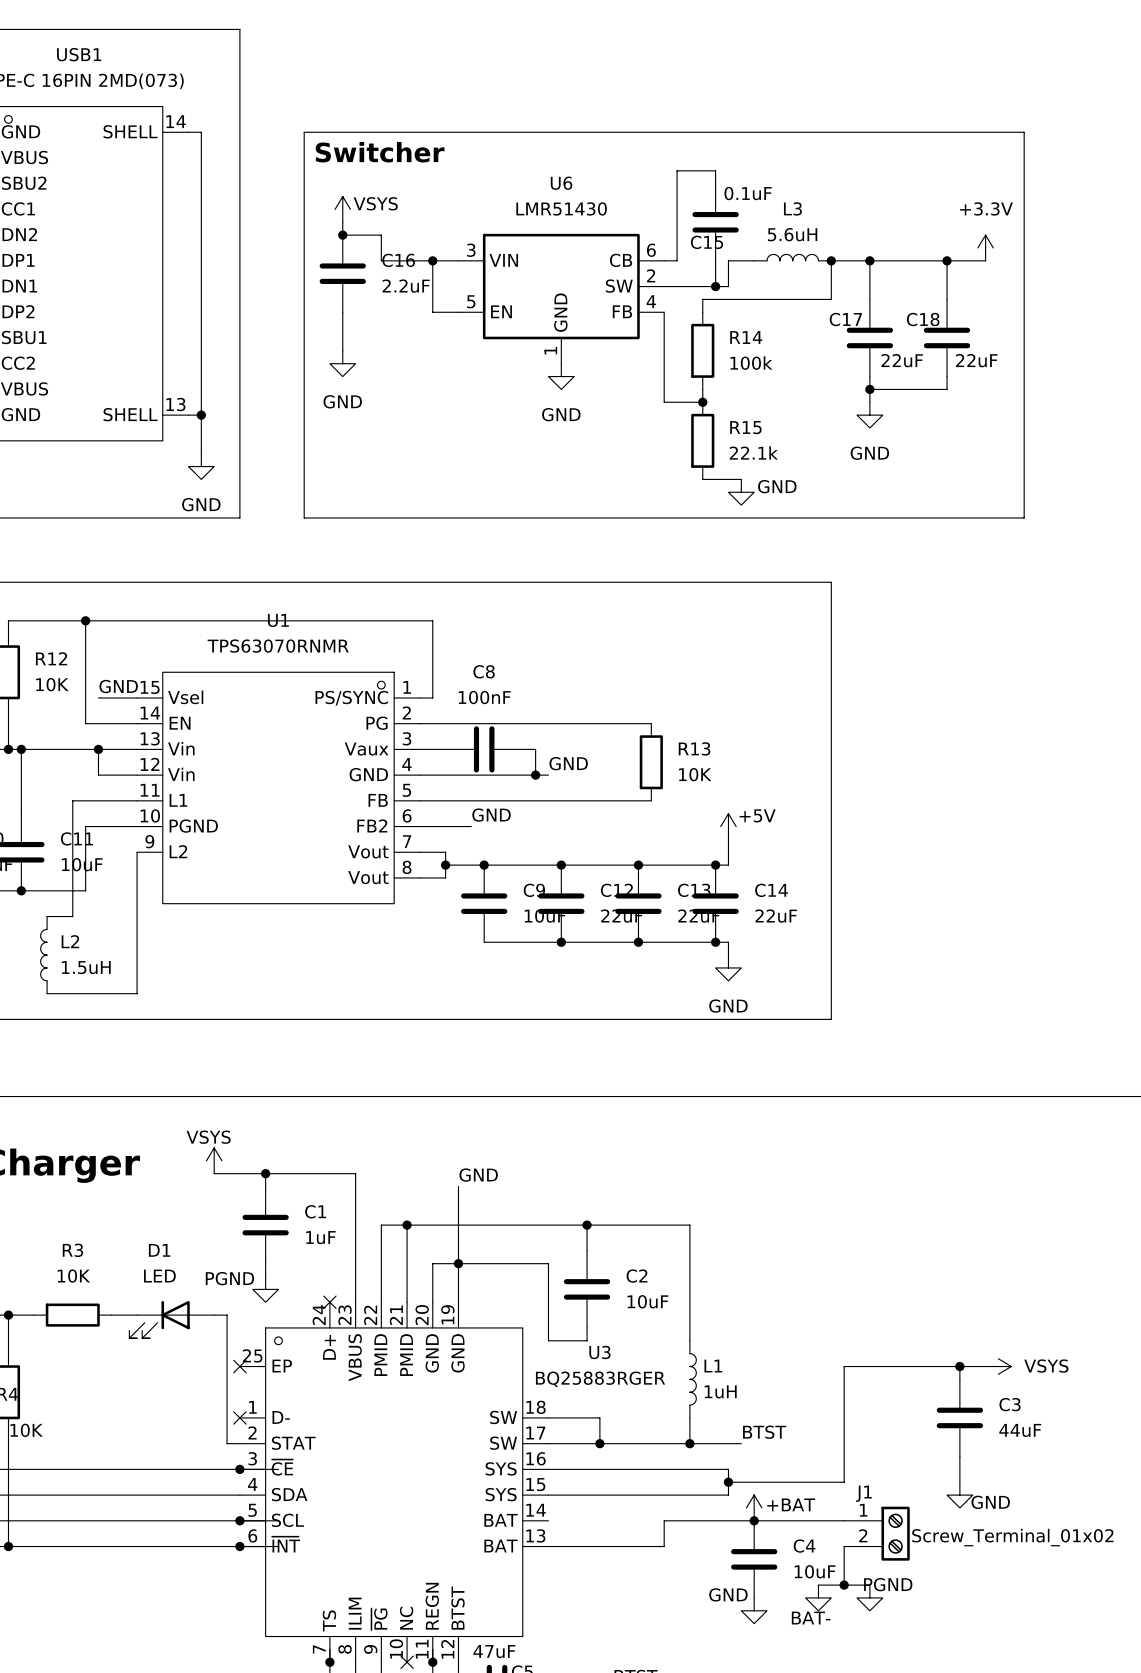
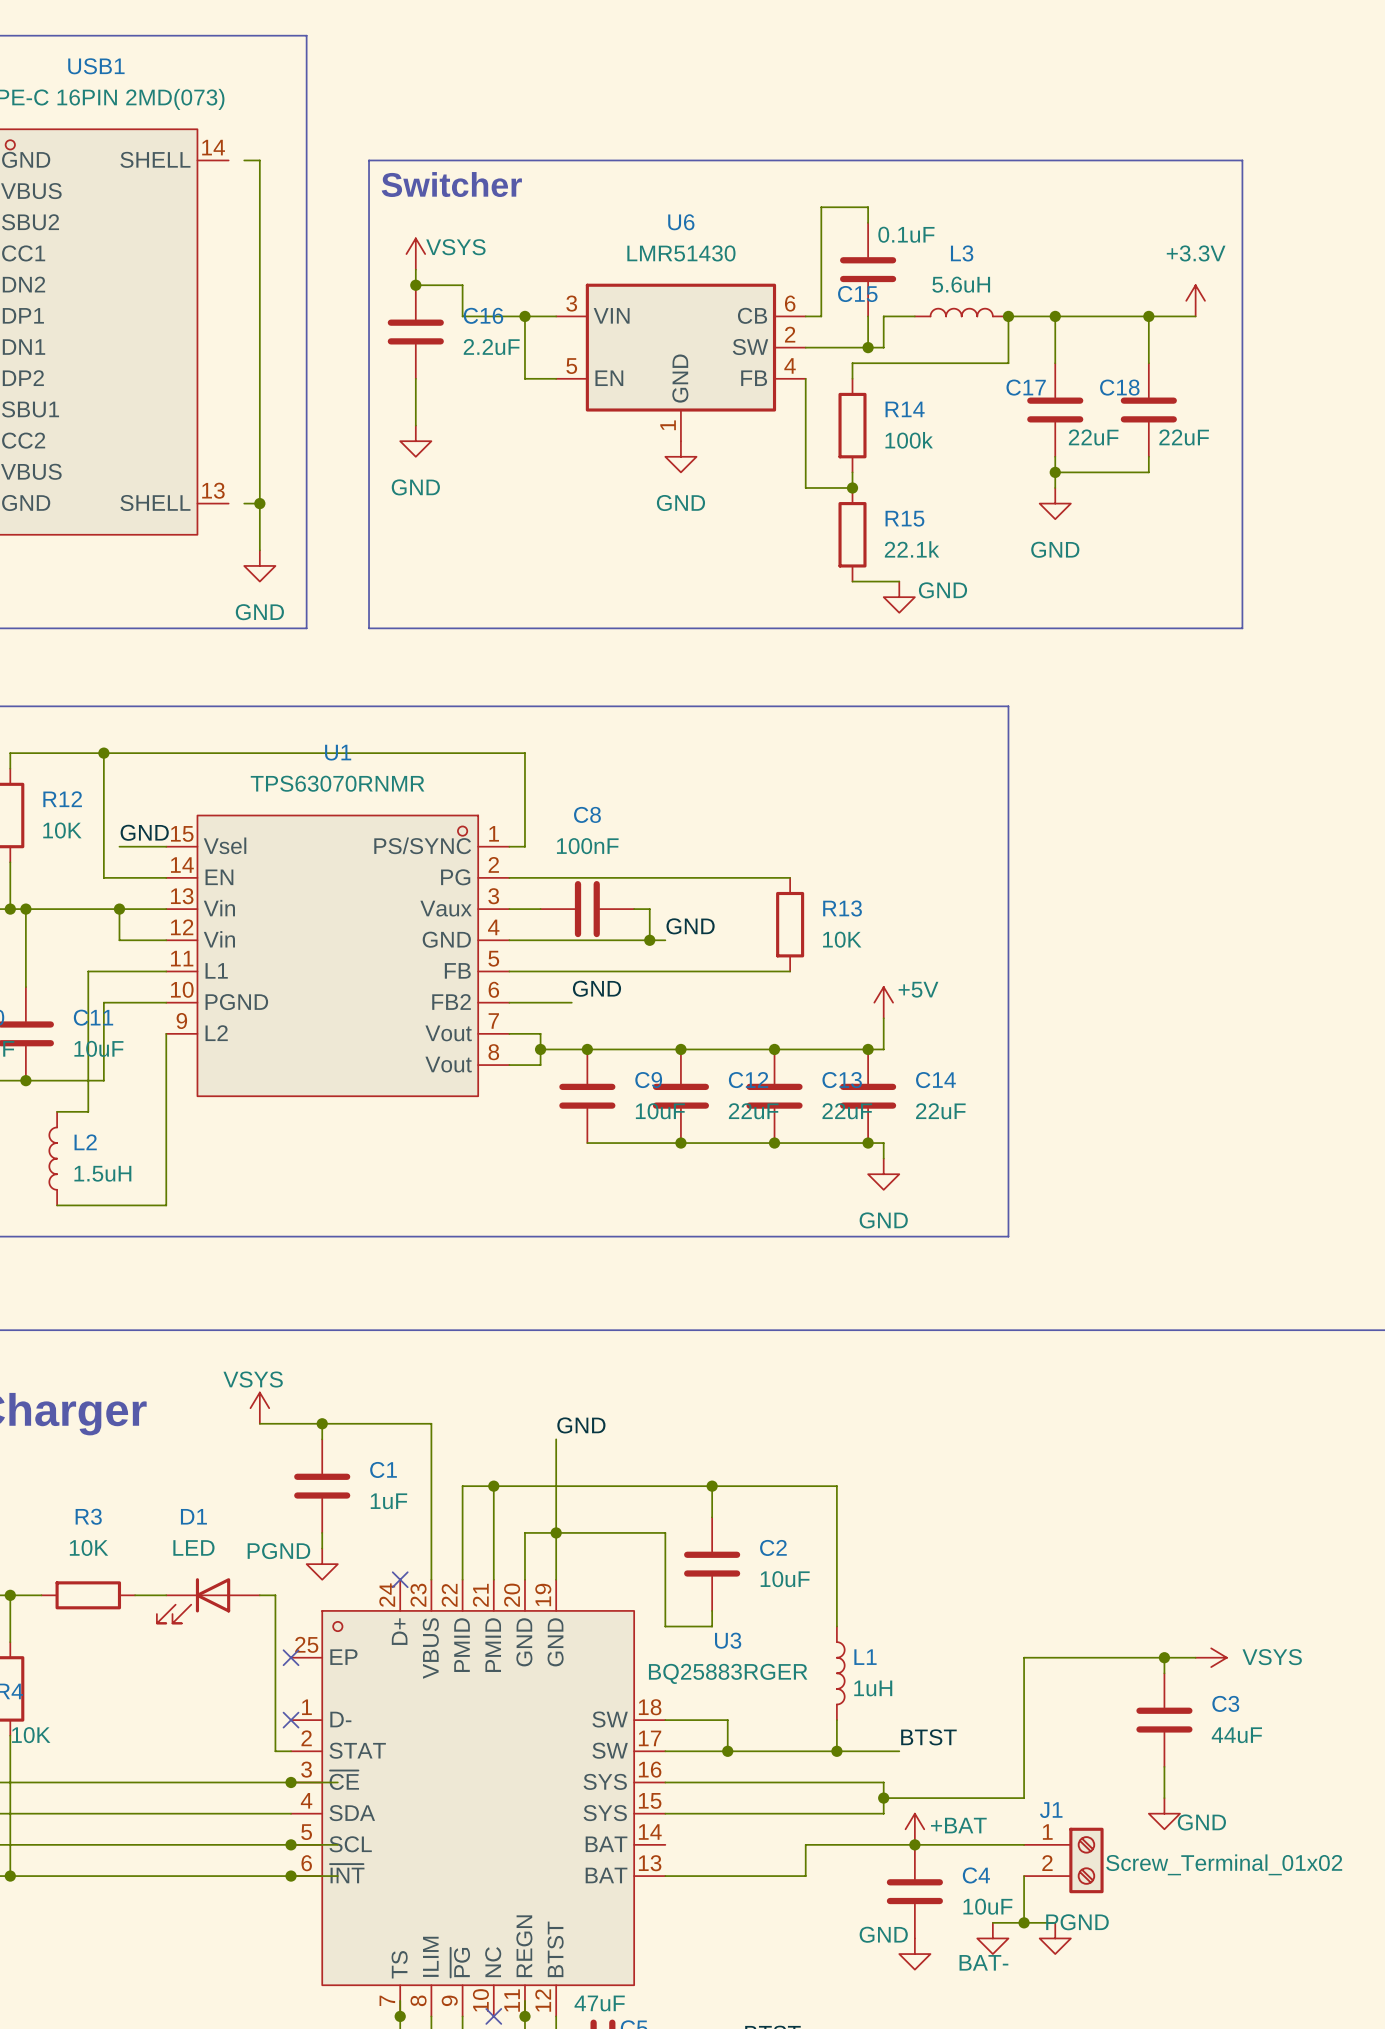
line: (239, 29) (239, 517) -> (291, 35) (306, 35) (306, 628) (291, 628)
wire: (188, 132) (201, 132) (201, 453) -> (244, 160) (259, 160) (259, 550)
wire: (188, 415) (201, 415) -> (259, 503) (244, 503)
junction position: (201, 415) -> (259, 503)
power symbol position: GND (201, 466) -> GND (259, 565)

